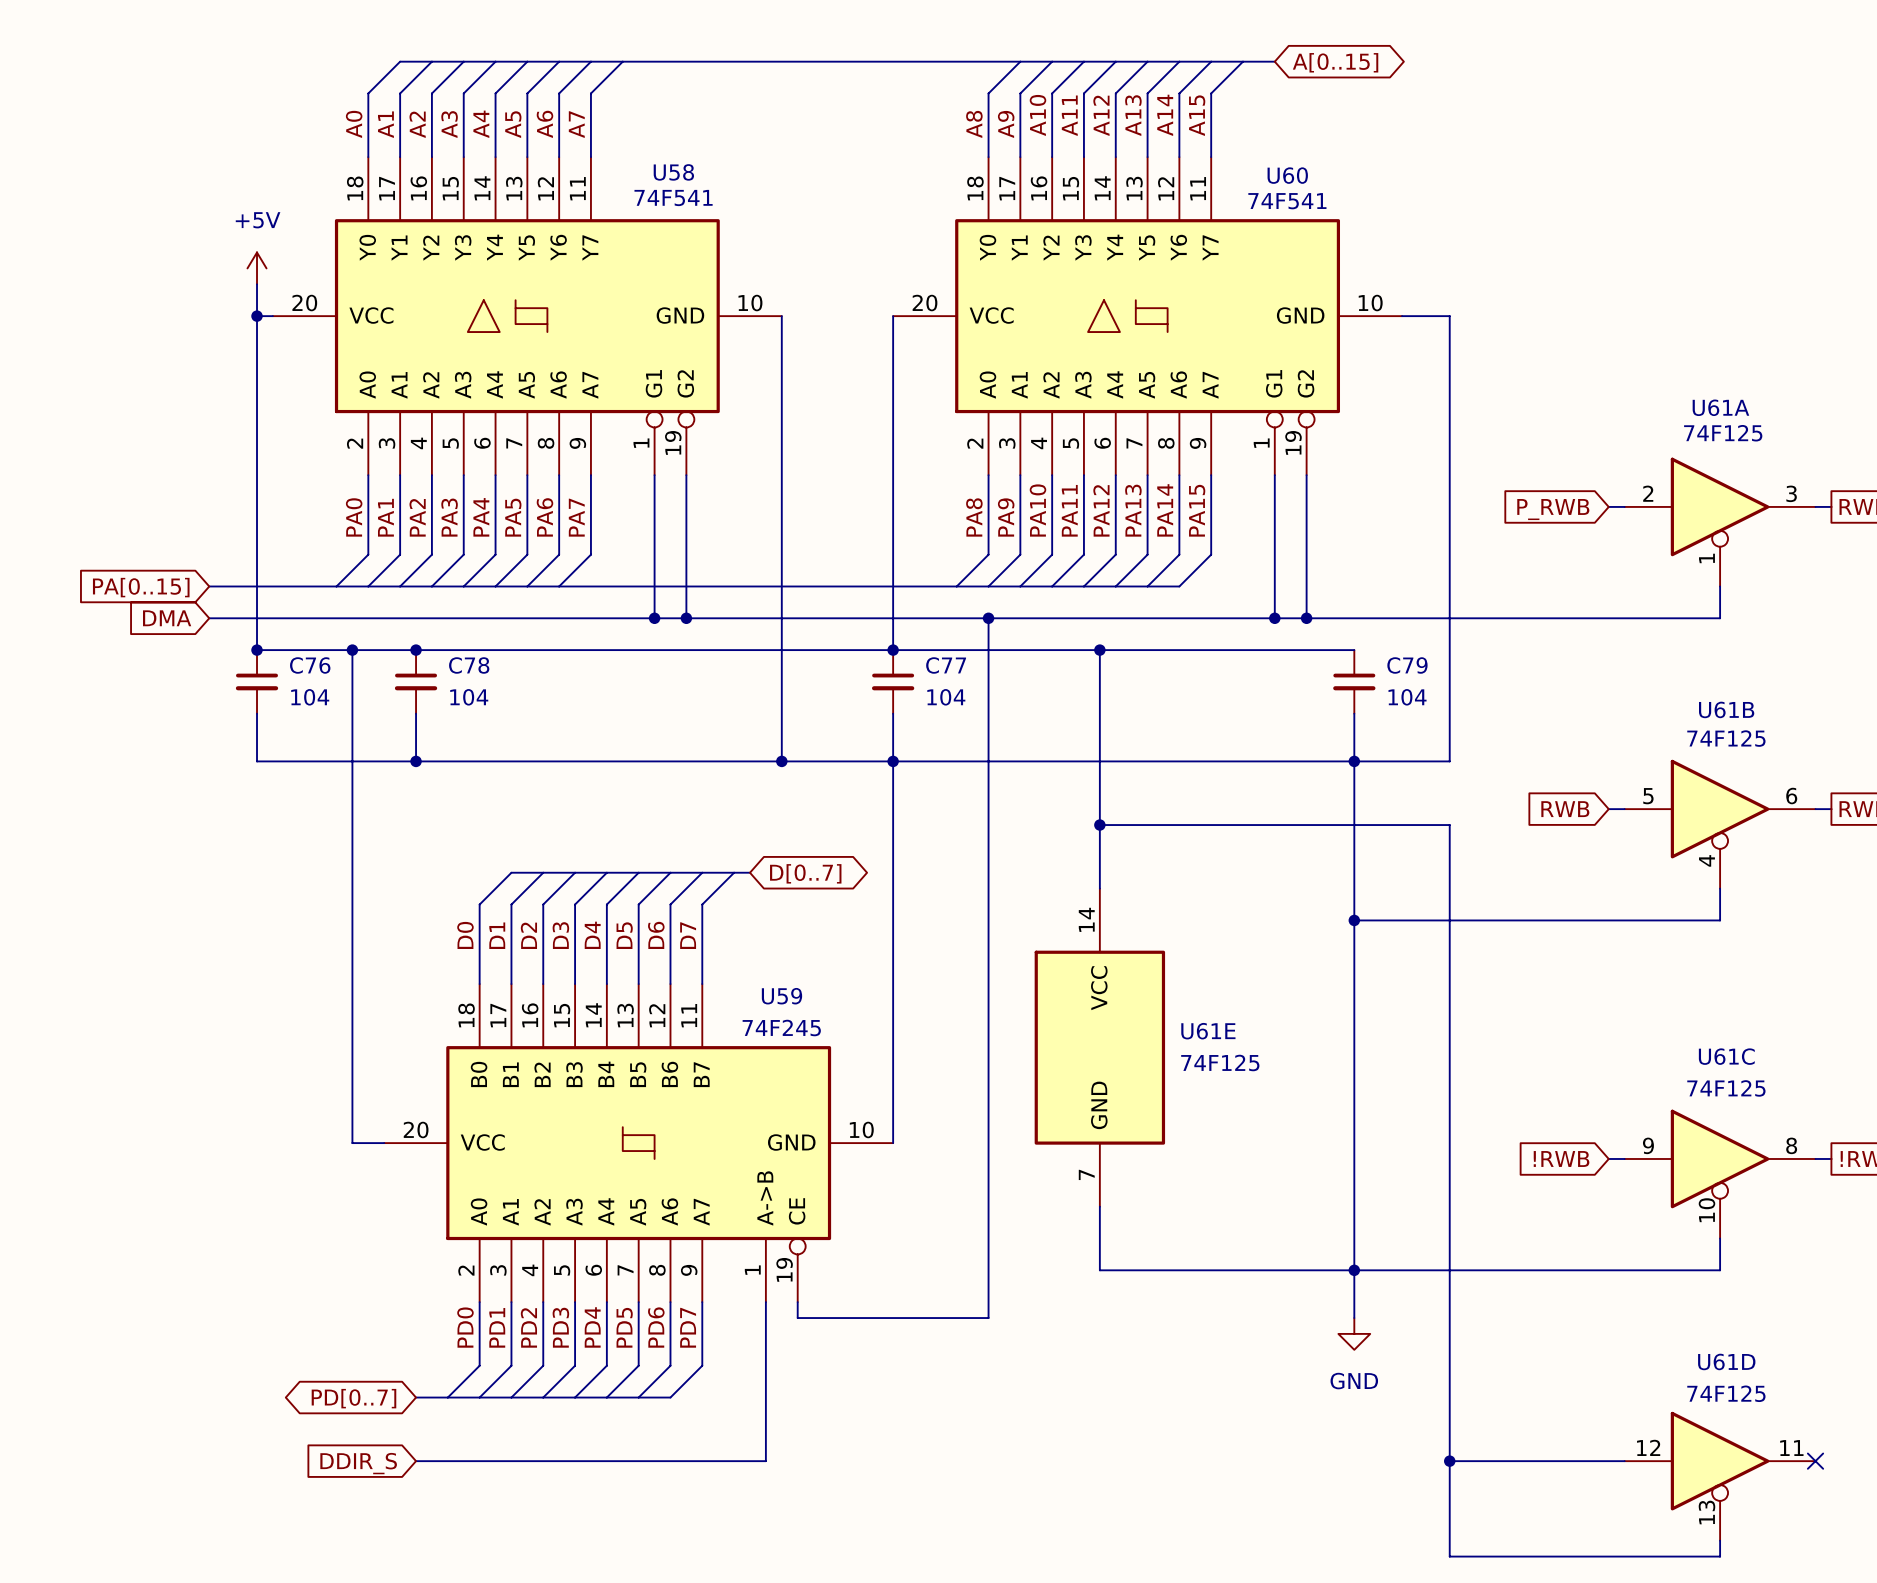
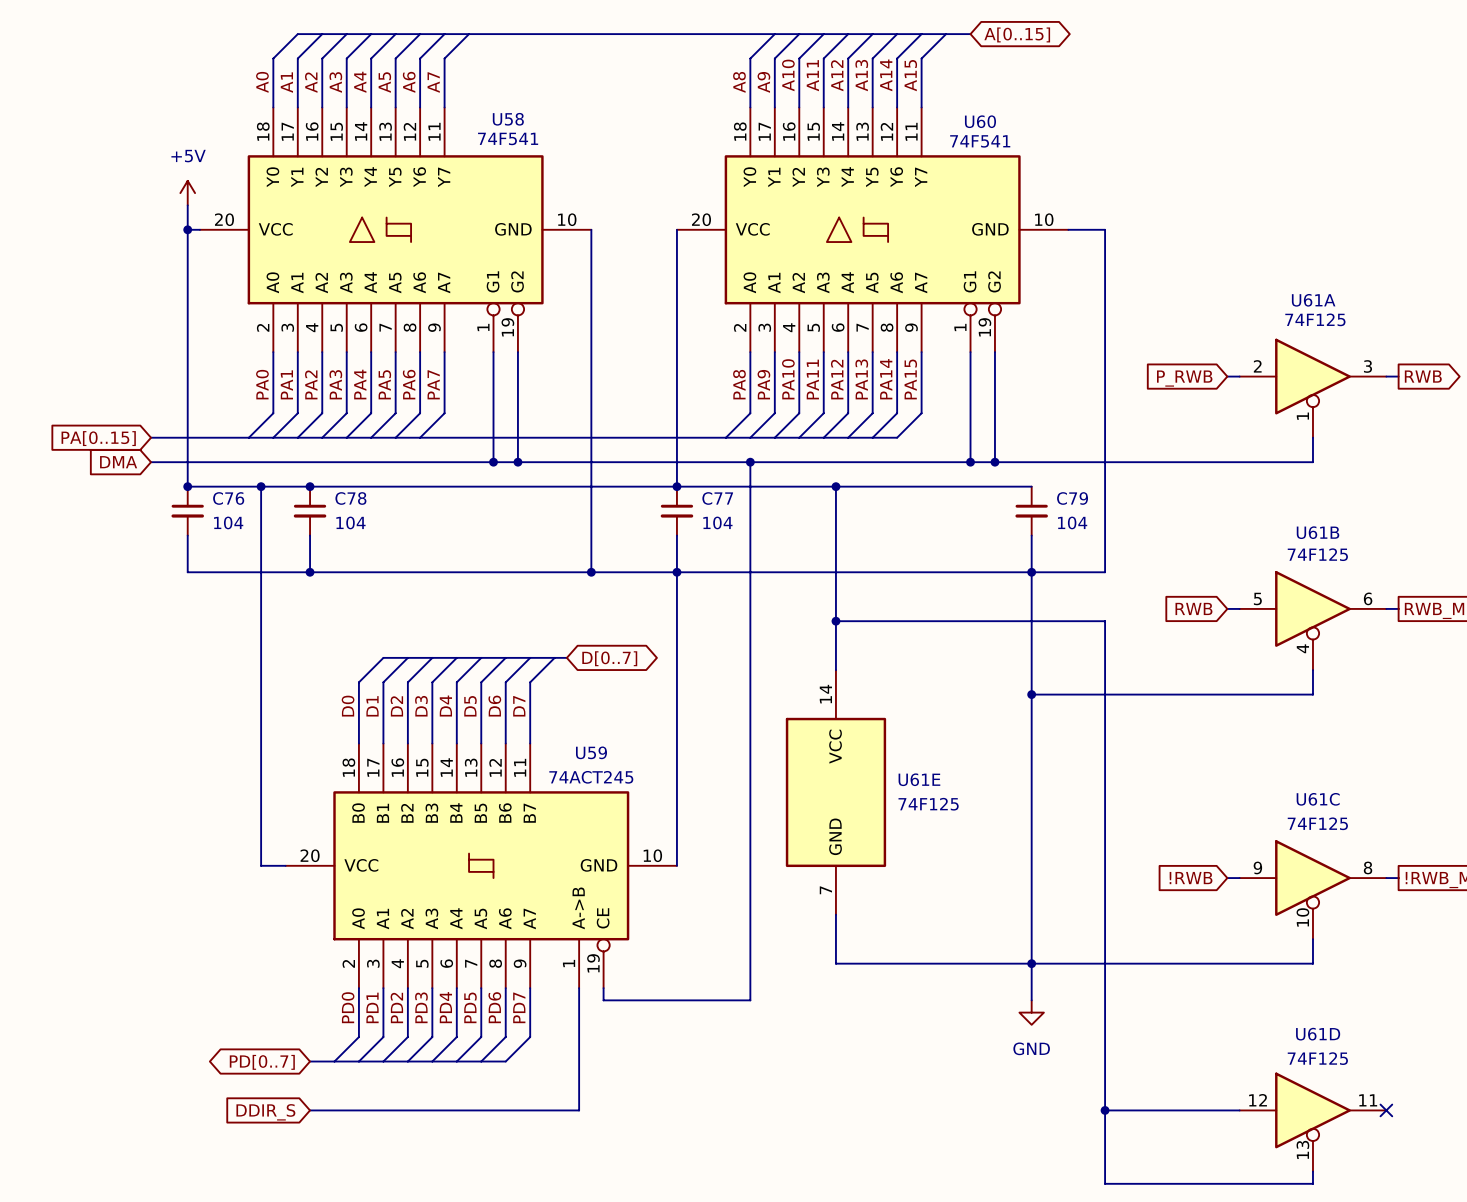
U59 value: 74F245 (781, 1028) -> 74ACT245 (591, 777)

